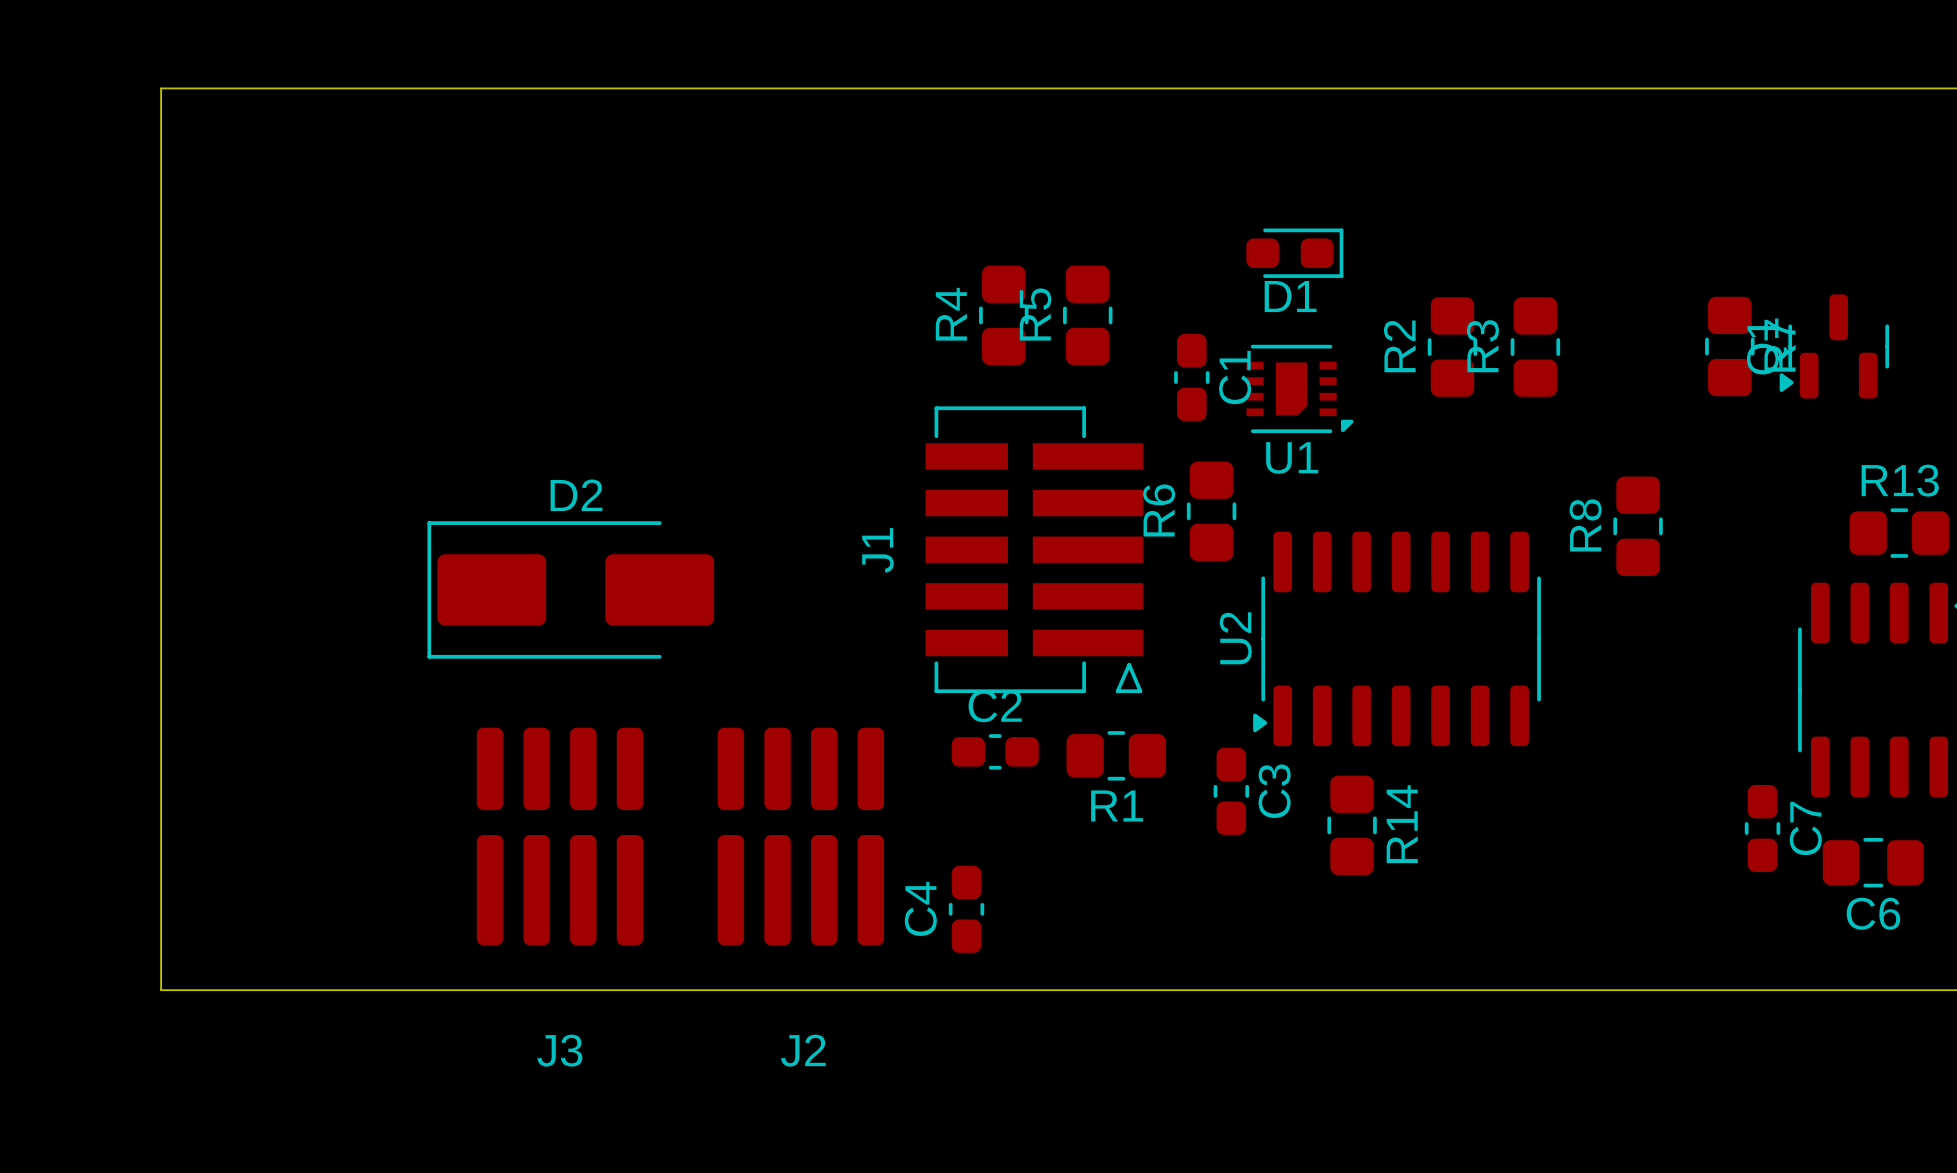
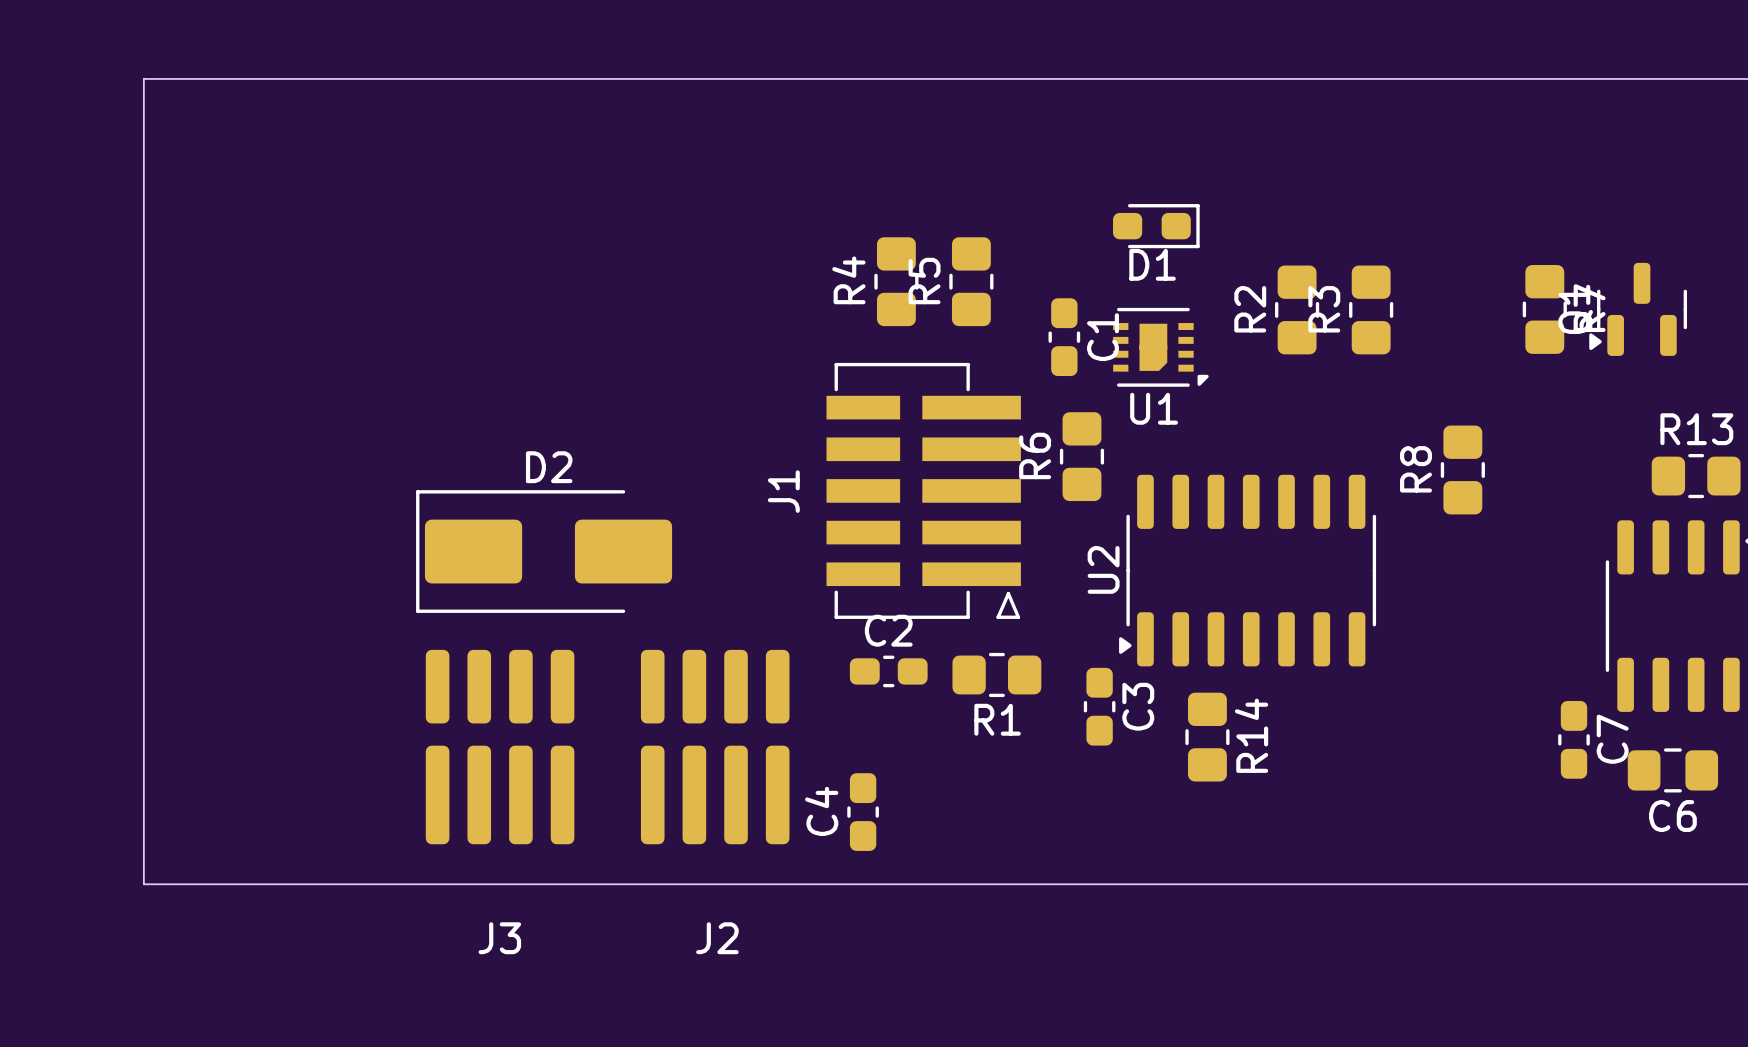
D2 position: (570, 589) -> (544, 551)

